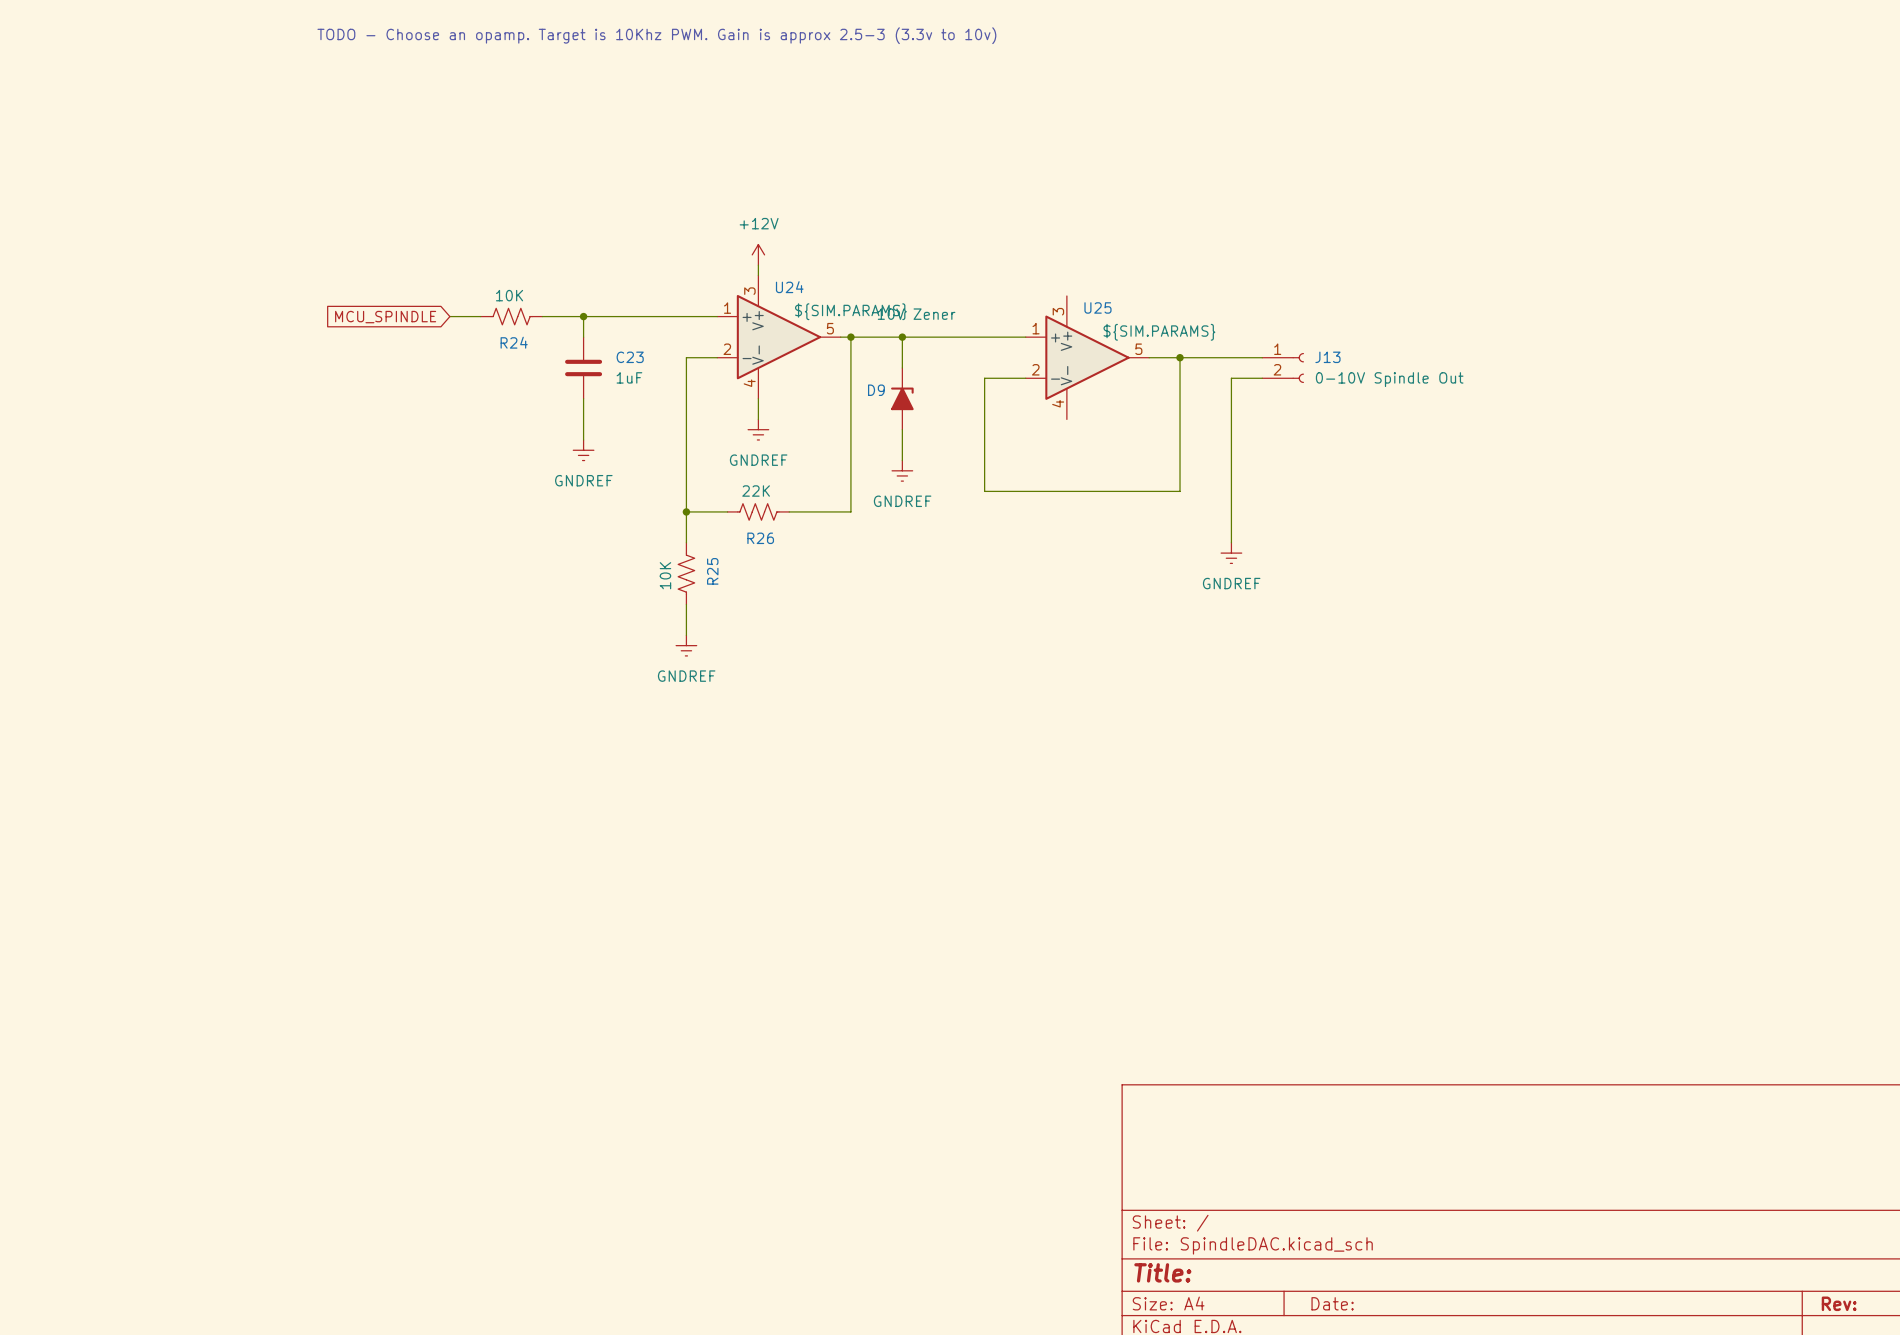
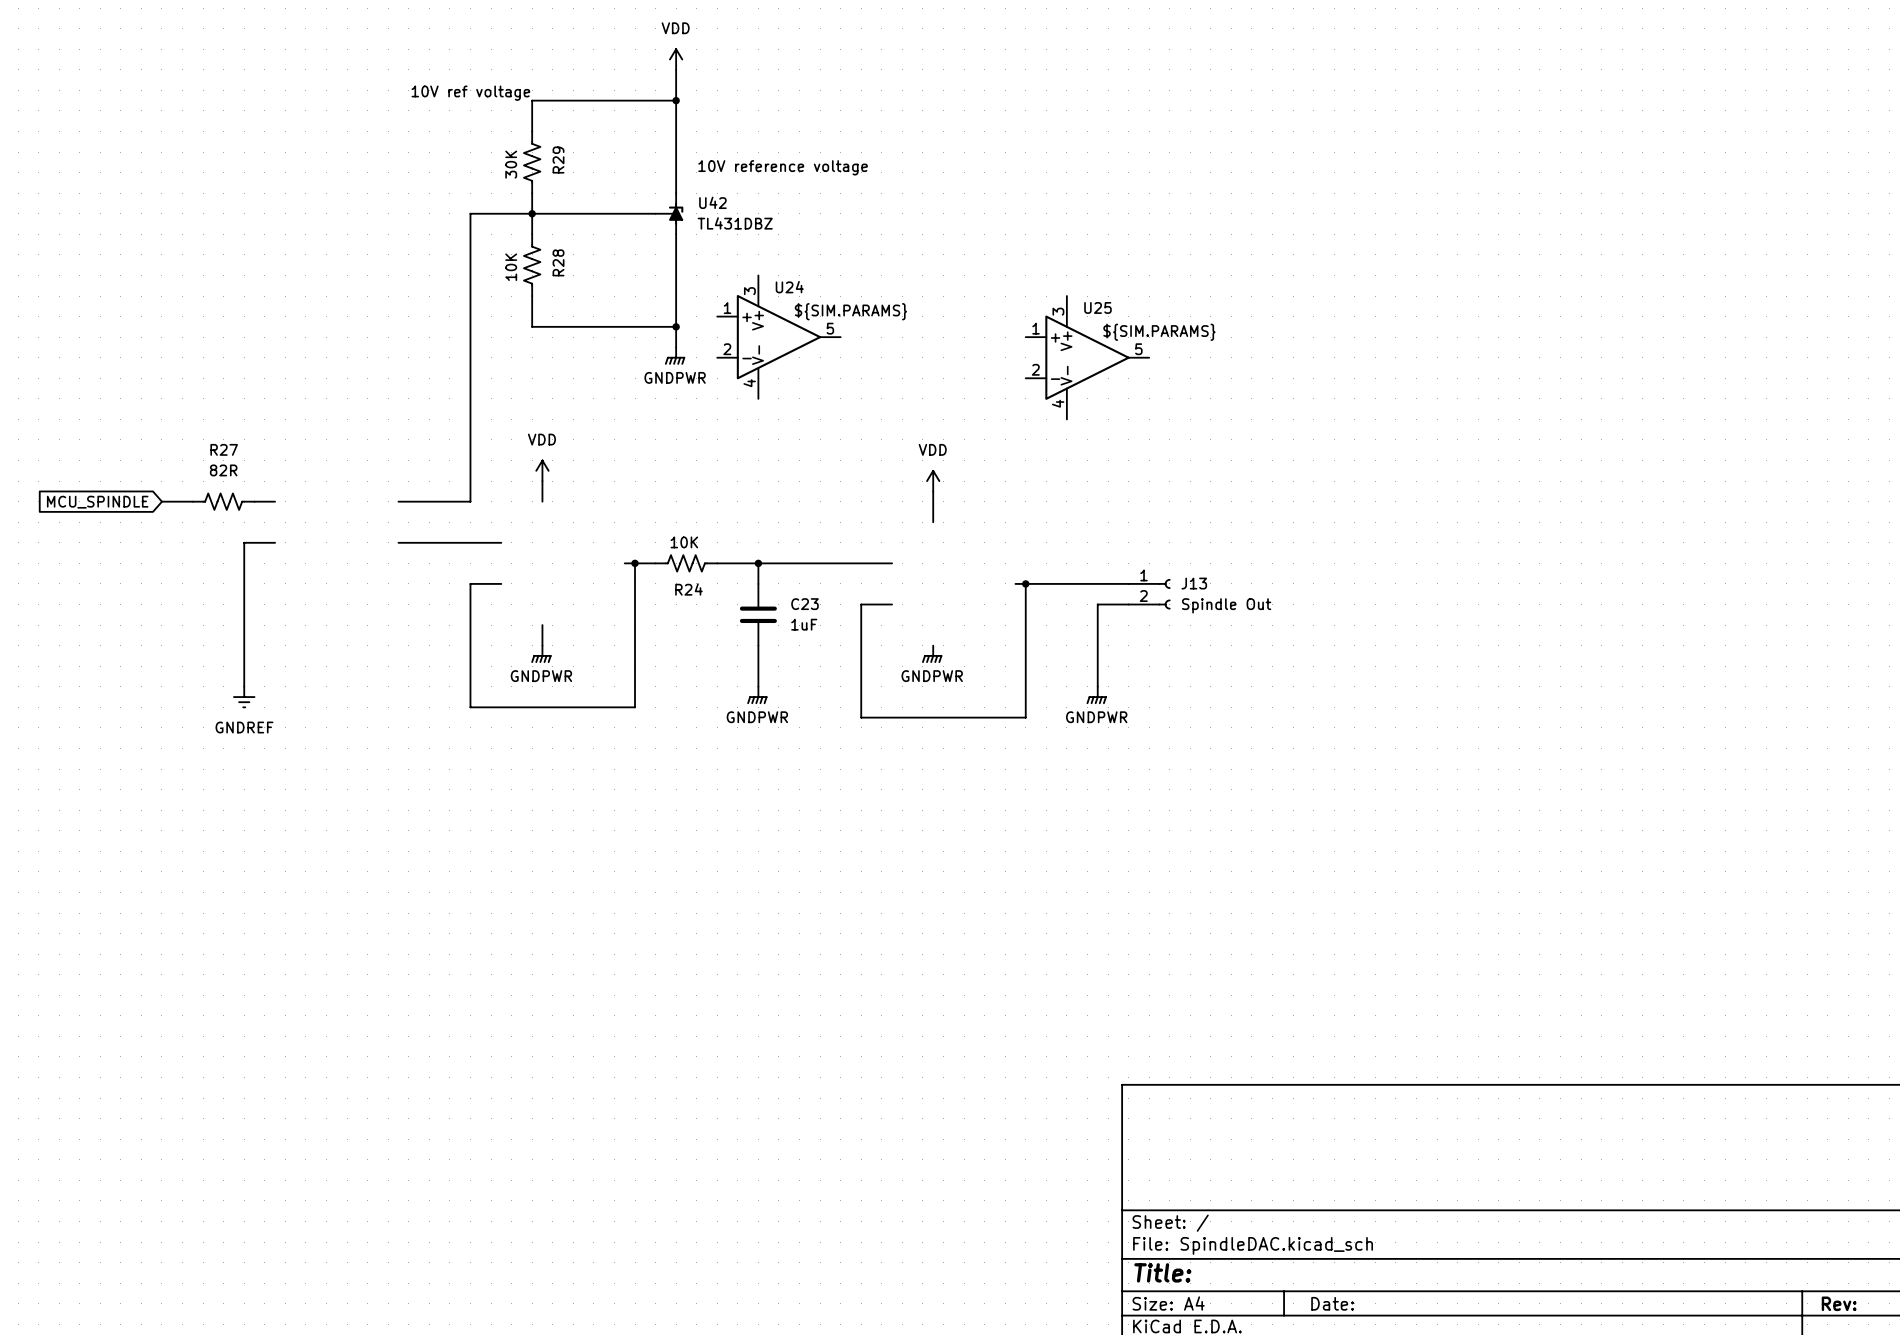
text: TODO - Choose an opamp. Target is 10Khz PWM. Gain is approx 2.5-3 (3.3v to 10v) (656, 35) -> none
power symbol: none -> VDD (676, 59)
wire: none -> (676, 69) (676, 193)
label: none -> 10V ref voltage (470, 93)
wire: none -> (676, 100) (532, 100) (532, 131)
junction: none -> (676, 100)
R29: none -> 30K (532, 162)
text: none -> 10V reference voltage (783, 167)
wire: none -> (532, 193) (532, 234)
junction: none -> (532, 213)
wire: none -> (655, 213) (470, 213) (470, 501) (398, 501)
U42: none -> TL431DBZ (669, 213)
wire: none -> (676, 234) (676, 347)
power symbol: +12V (758, 254) -> none
R28: none -> 10K (532, 265)
wire: (758, 265) (758, 275) -> none
wire: none -> (532, 296) (532, 326) (676, 326)
wire: (449, 316) (480, 316) -> none
R24 position: (511, 316) -> (686, 563)
wire: (542, 316) (717, 316) -> none
wire: (583, 316) (583, 337) -> (542, 481) (542, 501)
junction: (583, 316) -> none
global label: MCU_SPINDLE (385, 317) -> none
junction: none -> (676, 326)
wire: (840, 337) (1025, 337) -> none
wire: (850, 337) (850, 511) (789, 511) -> none
junction: (850, 337) -> none
wire: (902, 337) (902, 367) -> none
junction: (902, 337) -> none
power symbol: none -> GNDPWR (675, 356)
wire: (717, 357) (686, 357) (686, 542) -> none
wire: (1149, 357) (1262, 357) -> none
wire: (1180, 357) (1180, 491) (984, 491) (984, 378) (1025, 378) -> none
junction: (1180, 357) -> none
C23 position: (583, 367) -> (758, 614)
J13 position: (1283, 367) -> (1149, 594)
wire: (1262, 378) (1231, 378) (1231, 542) -> none
J13 value: 0-10V Spindle Out (1389, 379) -> Spindle Out (1226, 605)
wire: (583, 398) (583, 439) -> none
wire: (758, 398) (758, 419) -> (758, 563) (758, 583)
D9: 10V Zener (902, 398) -> none
power symbol: GNDREF (758, 429) -> none
wire: (902, 429) (902, 460) -> (933, 491) (933, 522)
power symbol: GNDREF (583, 450) -> none
power symbol: none -> VDD (542, 470)
power symbol: GNDREF (902, 470) -> none
power symbol: none -> VDD (933, 481)
wire: none -> (161, 501) (192, 501)
R27: none -> 82R (223, 501)
wire: none -> (254, 501) (275, 501)
global label: none -> MCU_SPINDLE (97, 502)
wire: (686, 511) (727, 511) -> none
junction: (686, 511) -> none
R26: 22K (758, 511) -> none
wire: none -> (275, 542) (244, 542) (244, 686)
wire: none -> (398, 542) (501, 542)
power symbol: GNDREF (1231, 553) -> none
wire: none -> (624, 563) (655, 563)
wire: none -> (635, 563) (635, 707) (470, 707) (470, 583) (501, 583)
junction: none -> (635, 563)
wire: none -> (717, 563) (892, 563)
junction: none -> (758, 563)
R25: 10K (686, 573) -> none
wire: none -> (1015, 583) (1128, 583)
wire: none -> (1025, 583) (1025, 717) (861, 717) (861, 604) (892, 604)
junction: none -> (1025, 583)
wire: (686, 604) (686, 635) -> none
wire: none -> (1128, 604) (1097, 604) (1097, 686)
wire: none -> (542, 625) (542, 645)
power symbol: GNDREF (686, 645) -> none
wire: none -> (758, 645) (758, 686)
power symbol: none -> GNDPWR (541, 654)
power symbol: none -> GNDPWR (932, 654)
power symbol: none -> GNDPWR (757, 695)
power symbol: none -> GNDPWR (1096, 695)
power symbol: none -> GNDREF (244, 697)

